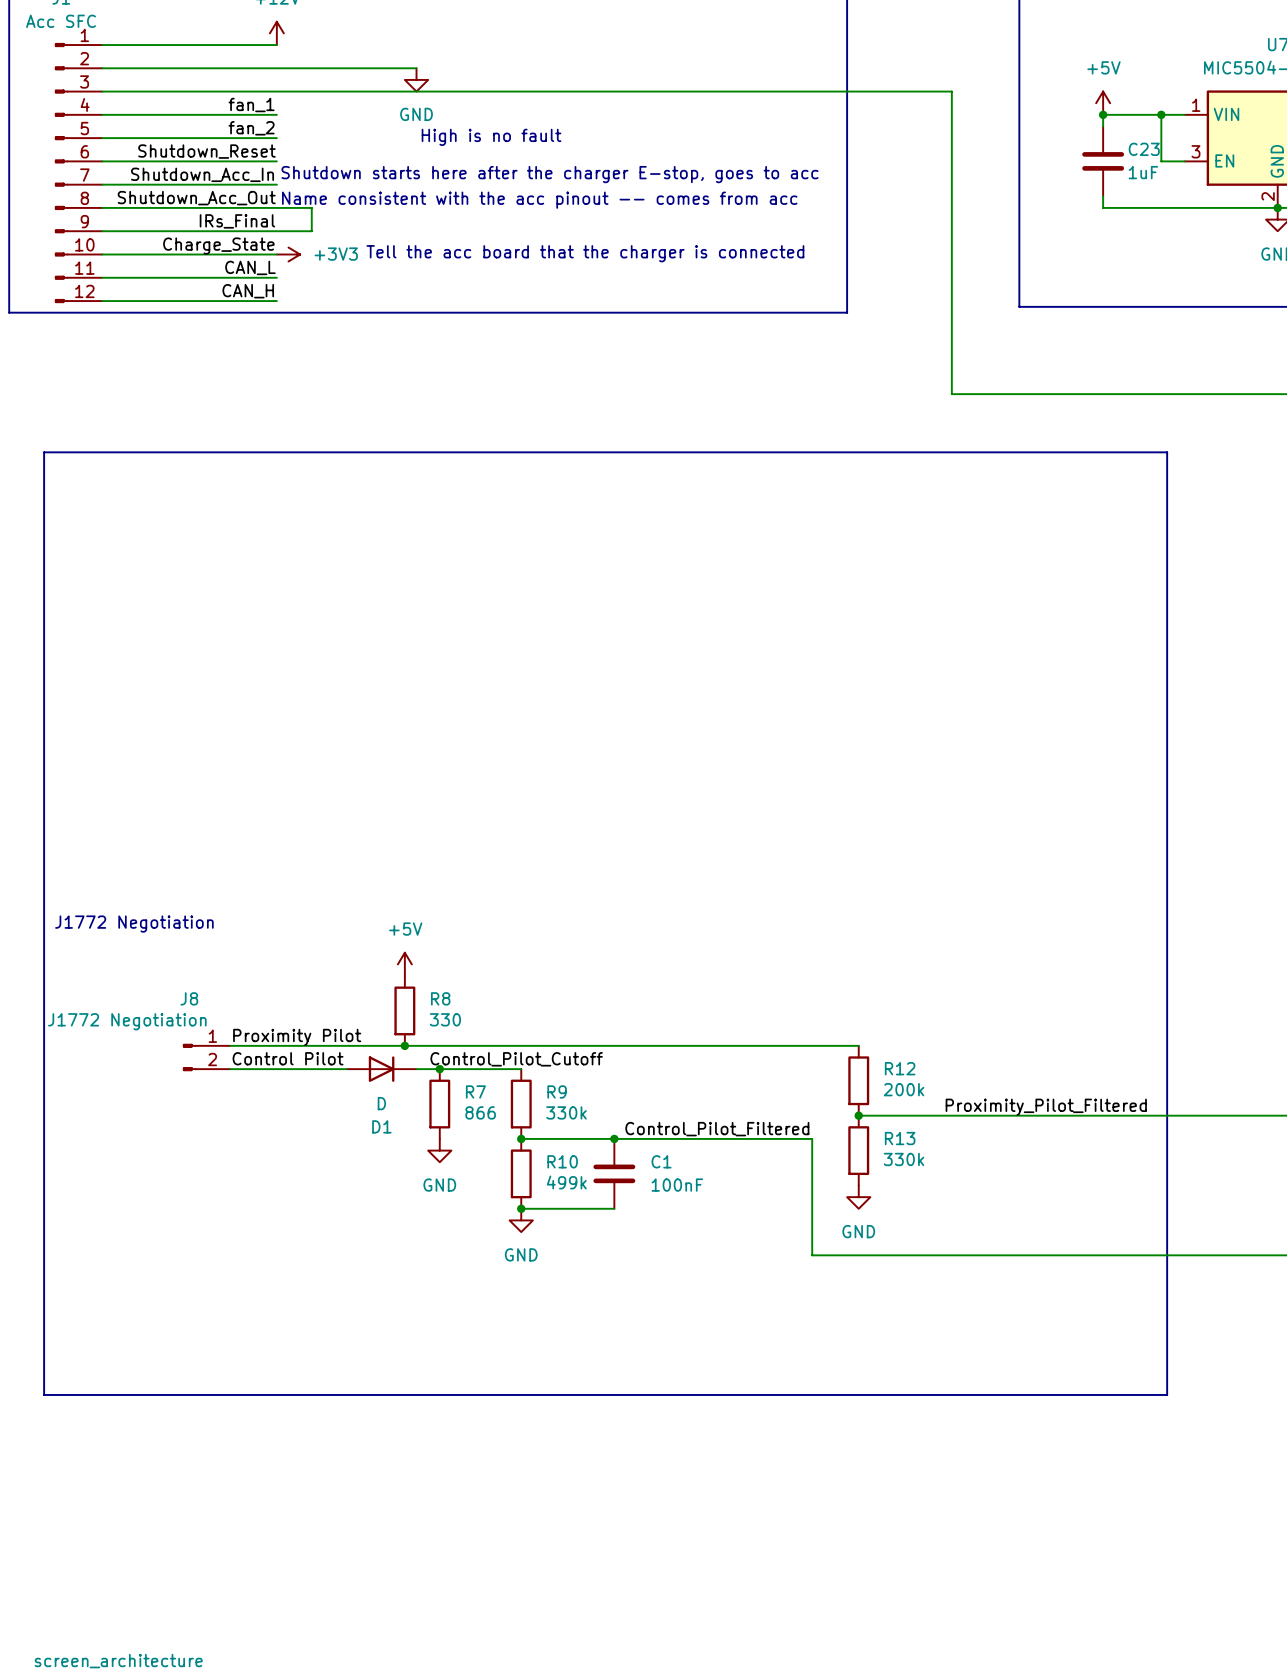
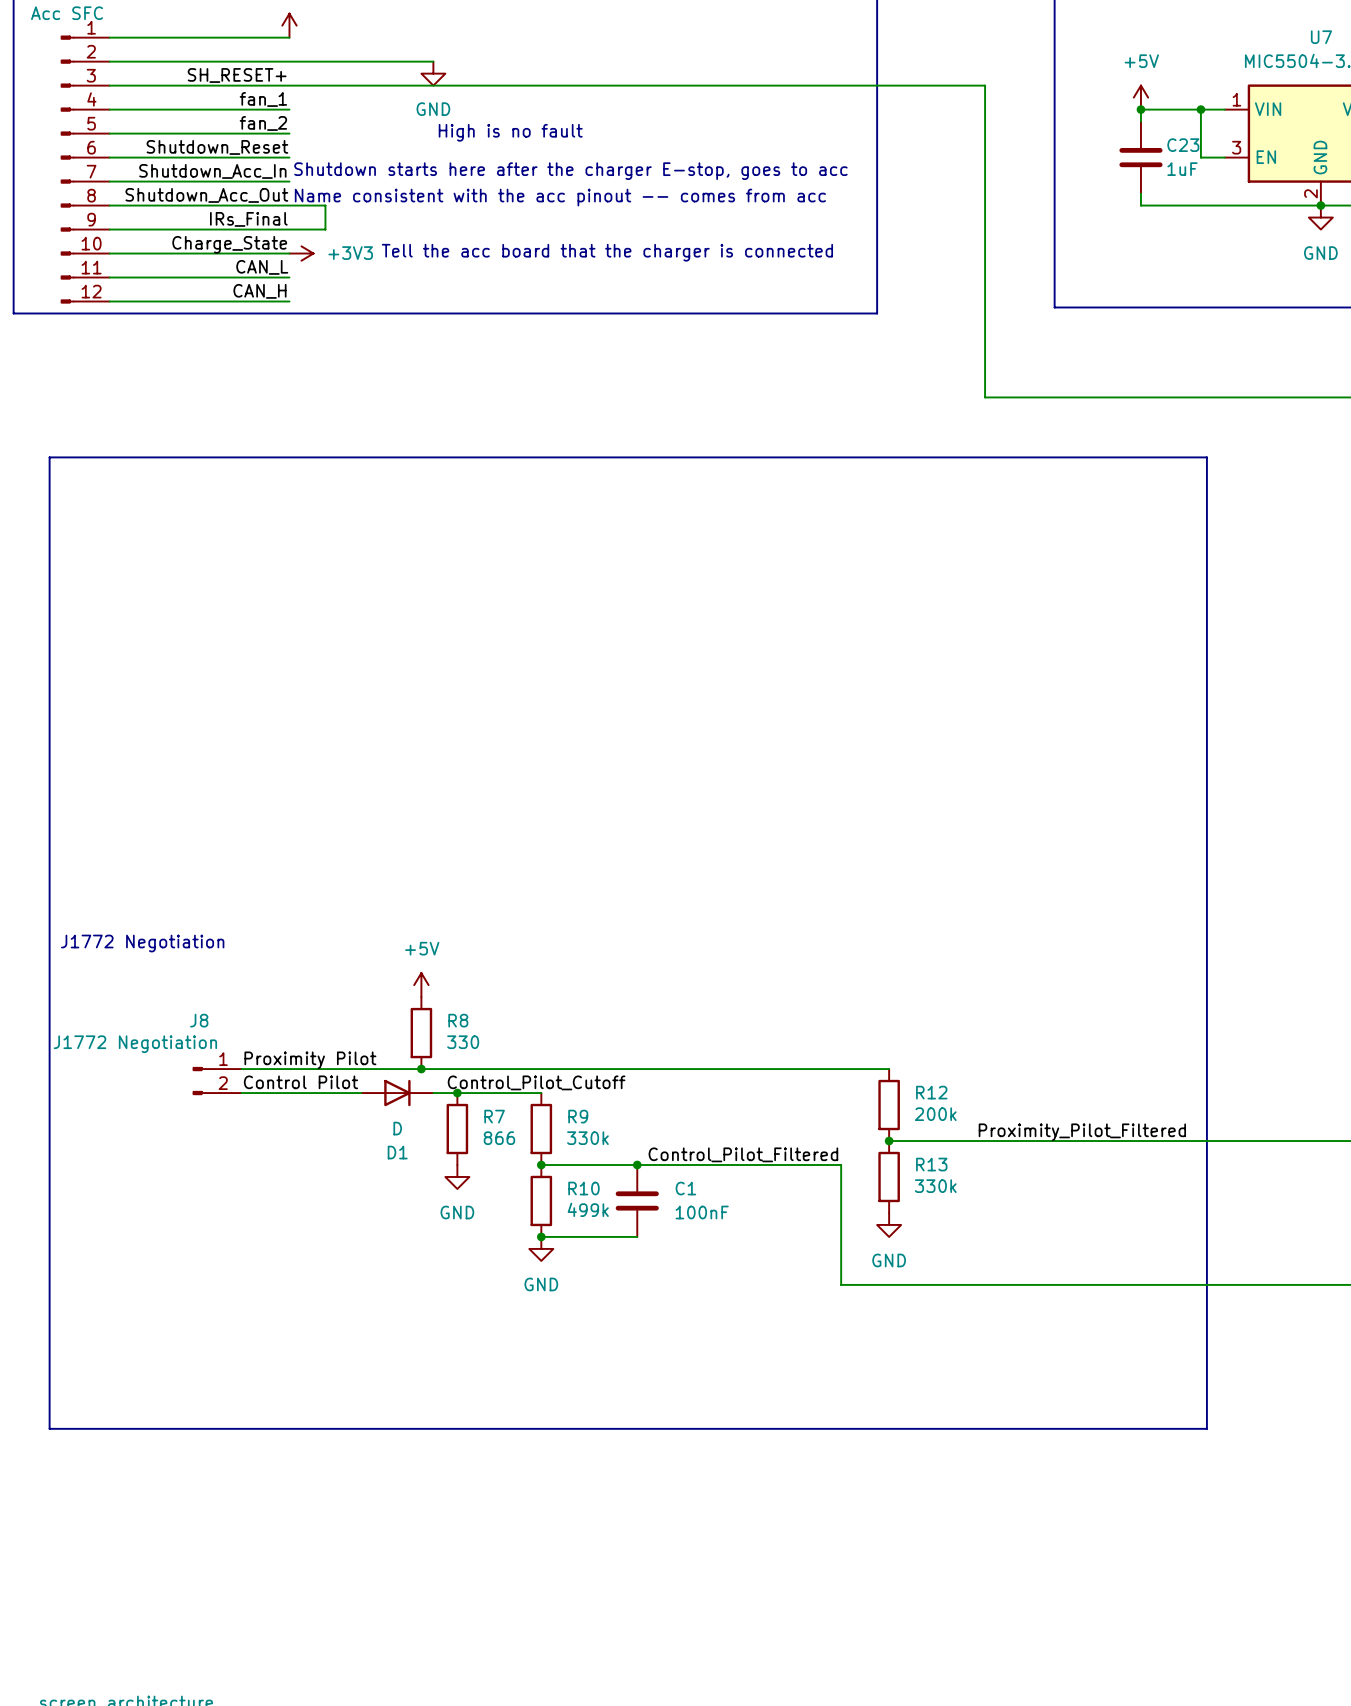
label: none -> SH_RESET+ (237, 75)

